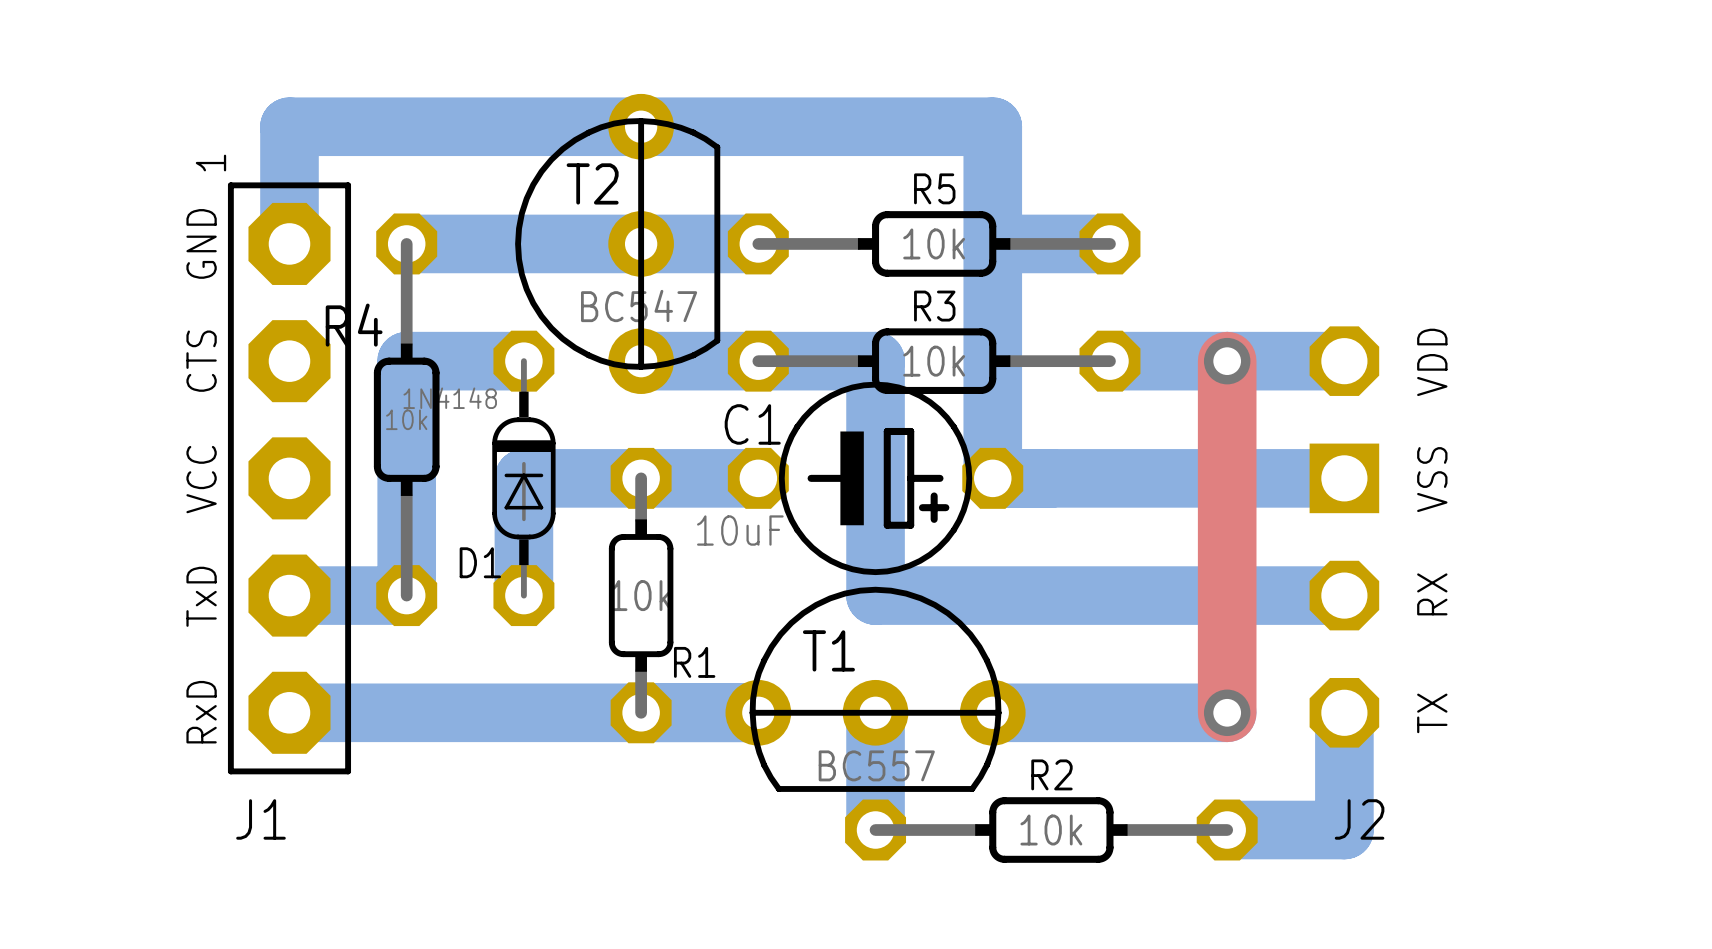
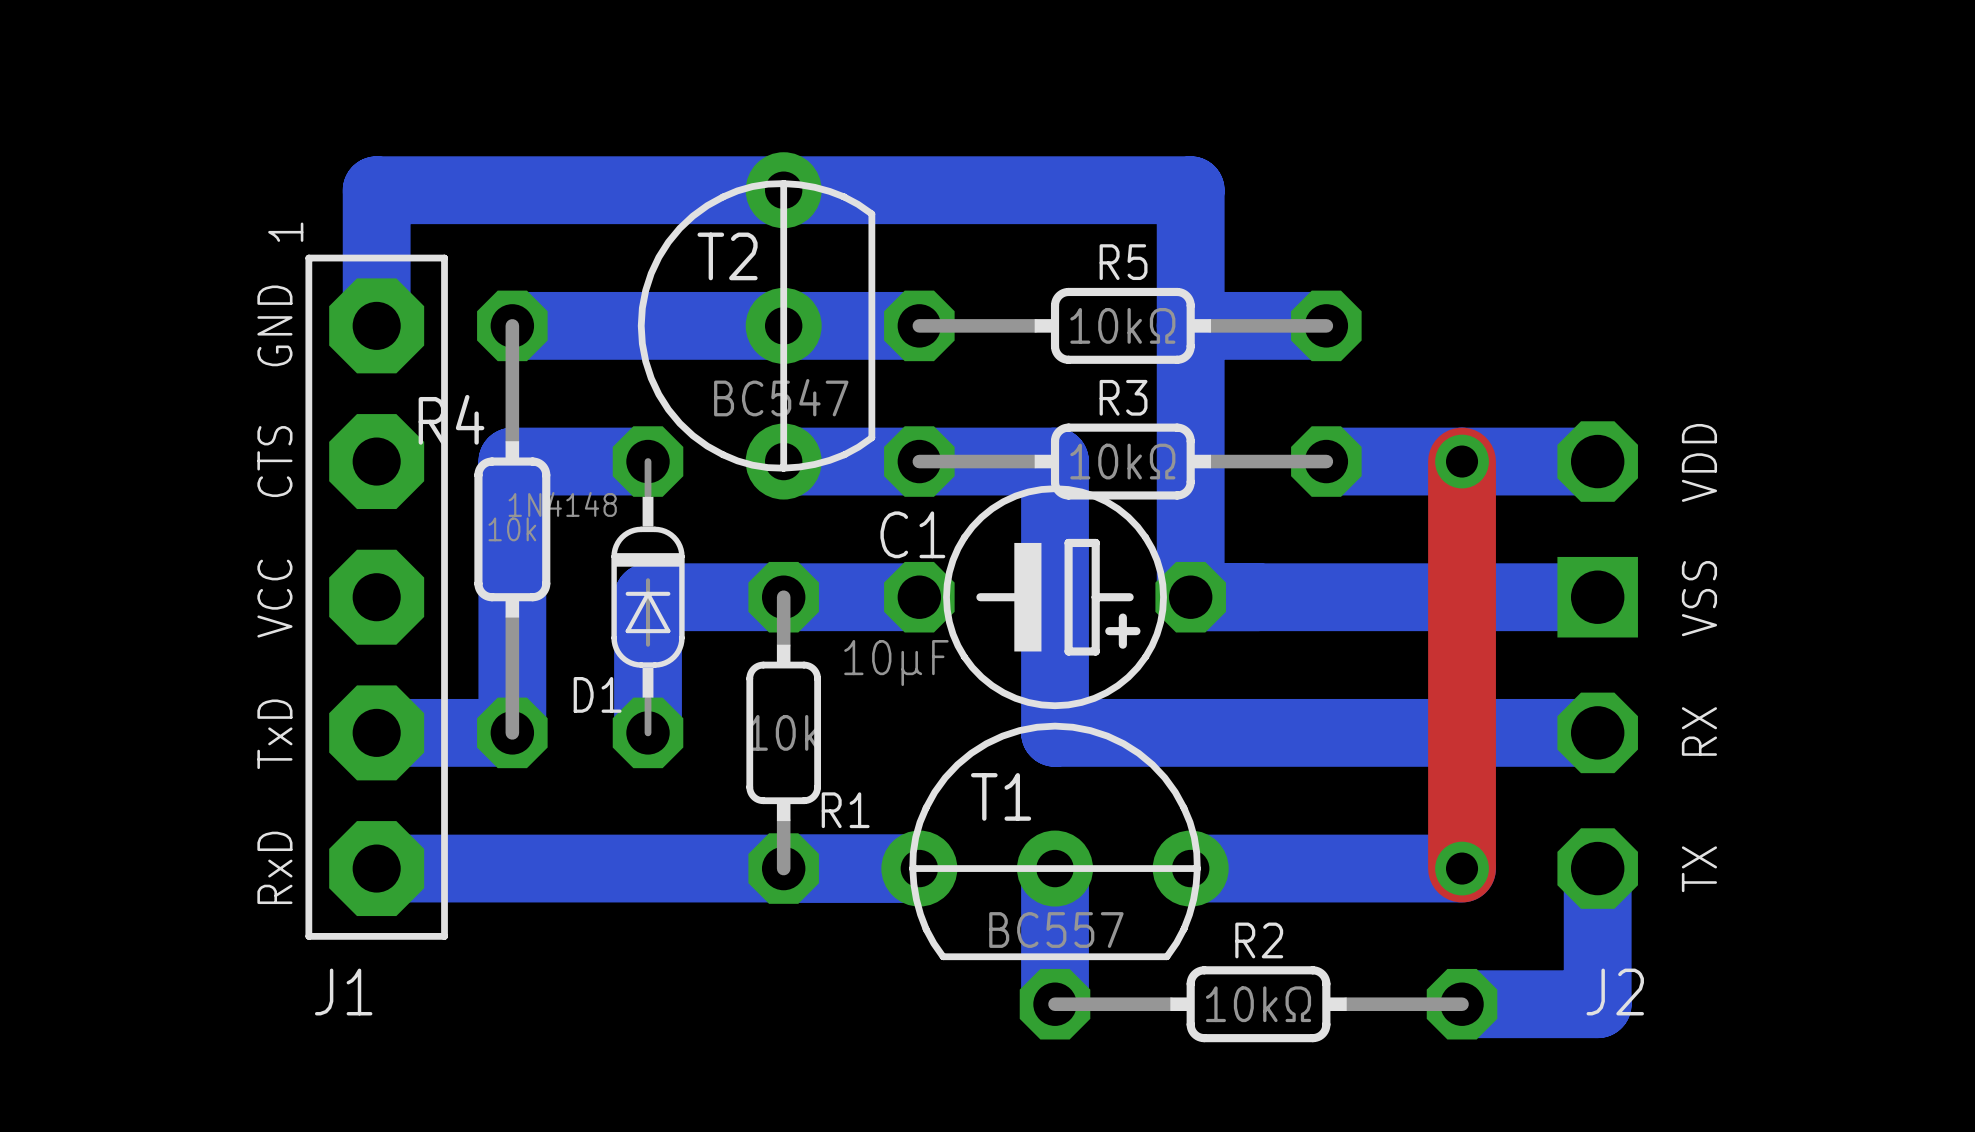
R5 value: 10k (934, 243) -> 10kΩ (1122, 325)
R3 value: 10k (934, 361) -> 10kΩ (1122, 461)
C1 value: 10uF (740, 530) -> 10μF (896, 663)
R2 value: 10k (1051, 830) -> 10kΩ (1258, 1004)

